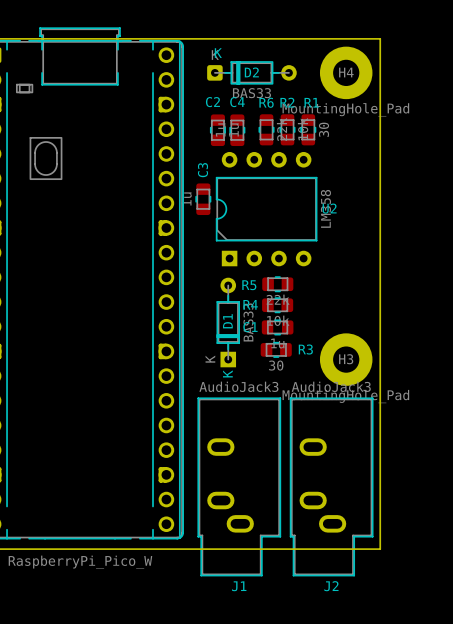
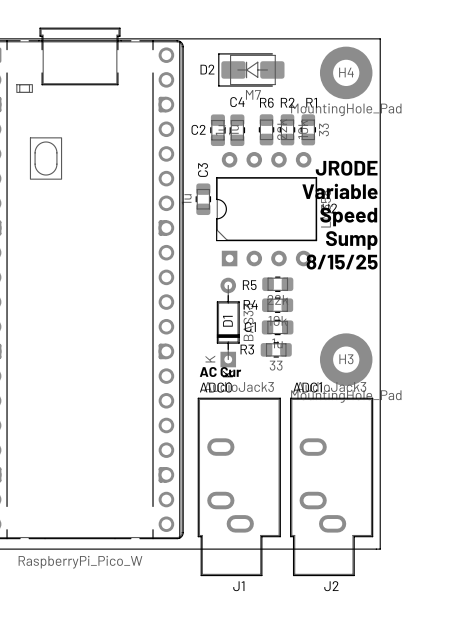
D2 footprint: [207, 61, 297, 85] -> [218, 53, 285, 87]
D2 name position: D2 (251, 72) -> D2 (207, 69)
D2 value: BAS33 (251, 93) -> M7 (253, 94)
C2 name position: C2 (212, 102) -> C2 (198, 129)
R1 value: 30 (323, 129) -> 33 (324, 129)
text: none -> JRODE (346, 168)
text: none -> Variable (339, 191)
text: none -> Speed (348, 216)
text: none -> Sump (351, 240)
text: none -> 8/15/25 (342, 262)
R3 name position: R3 (305, 349) -> R3 (247, 349)
R3 value: 30 (276, 365) -> 33 (276, 365)
text: none -> AC Cur (220, 372)
text: none -> ADC0 (215, 387)
text: none -> ADC1 (307, 387)

